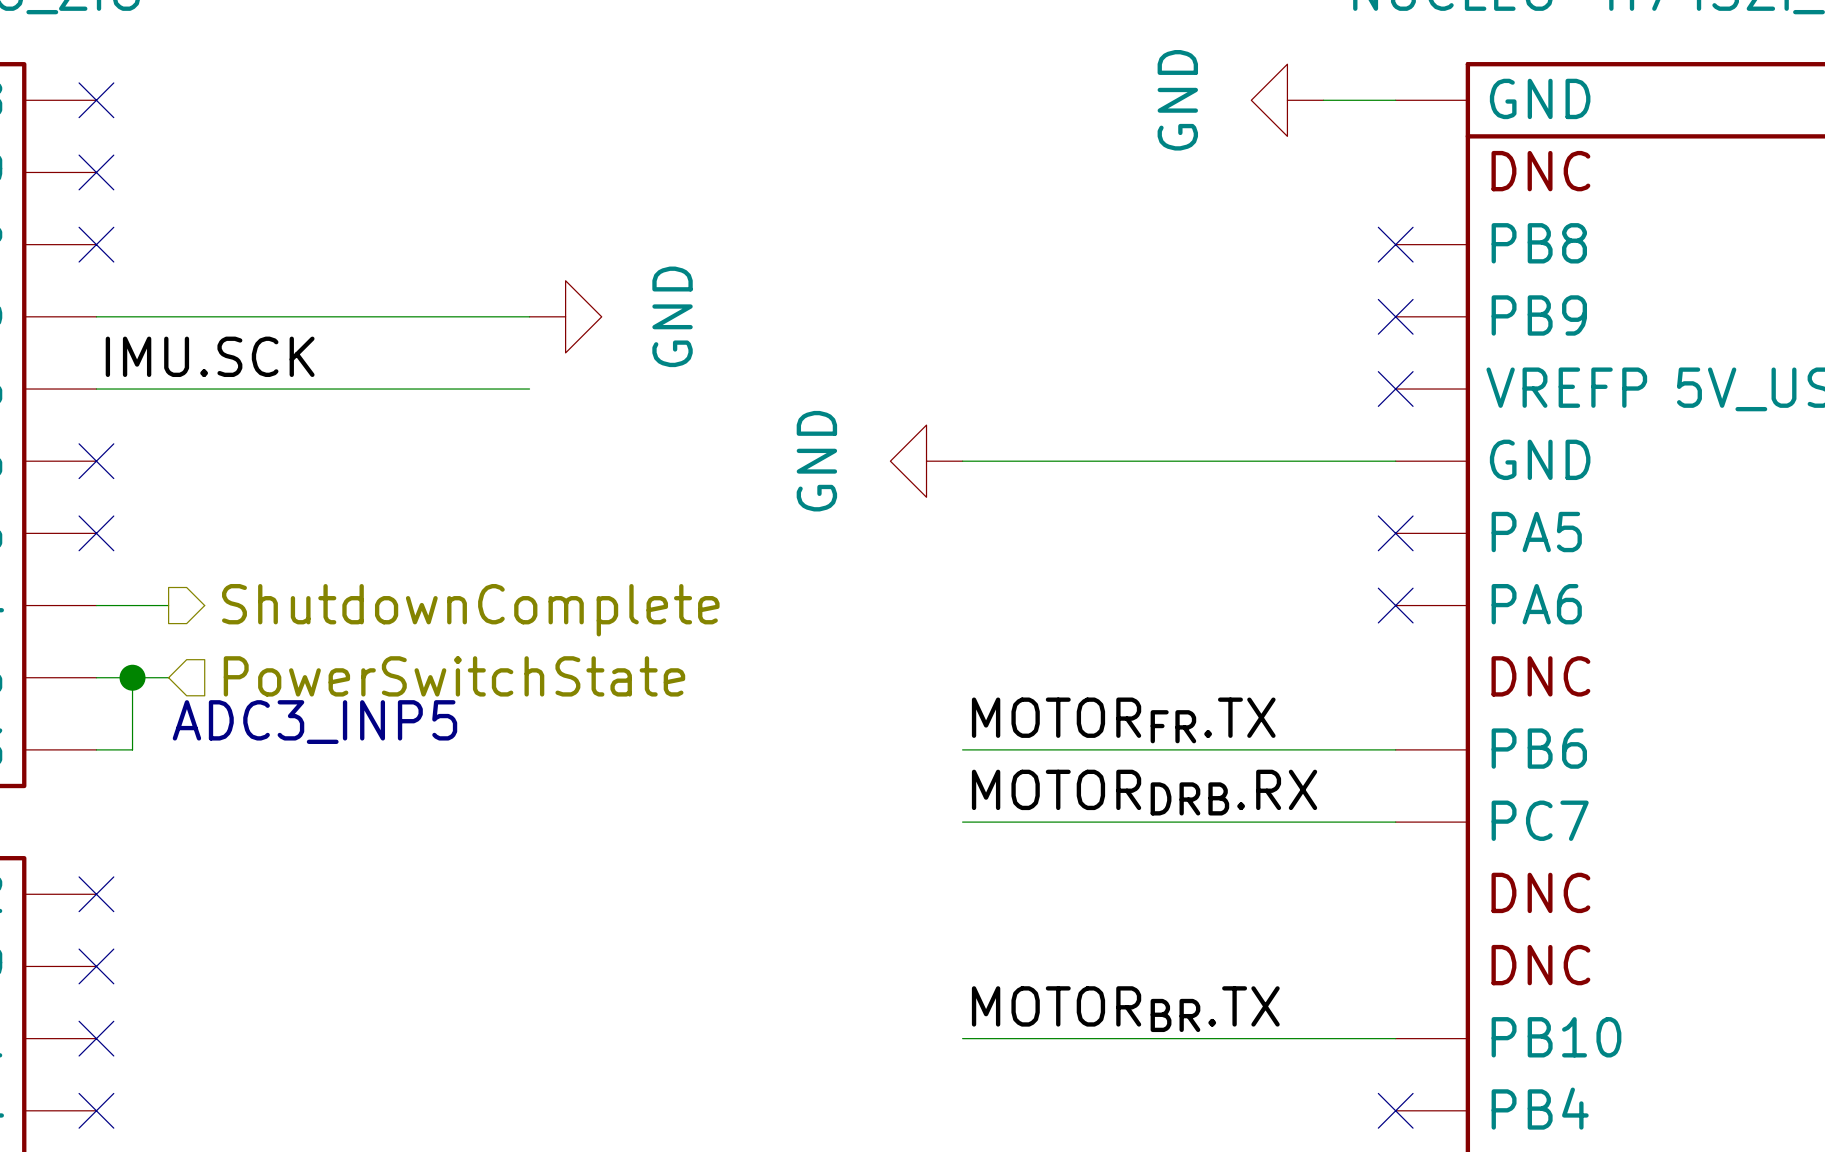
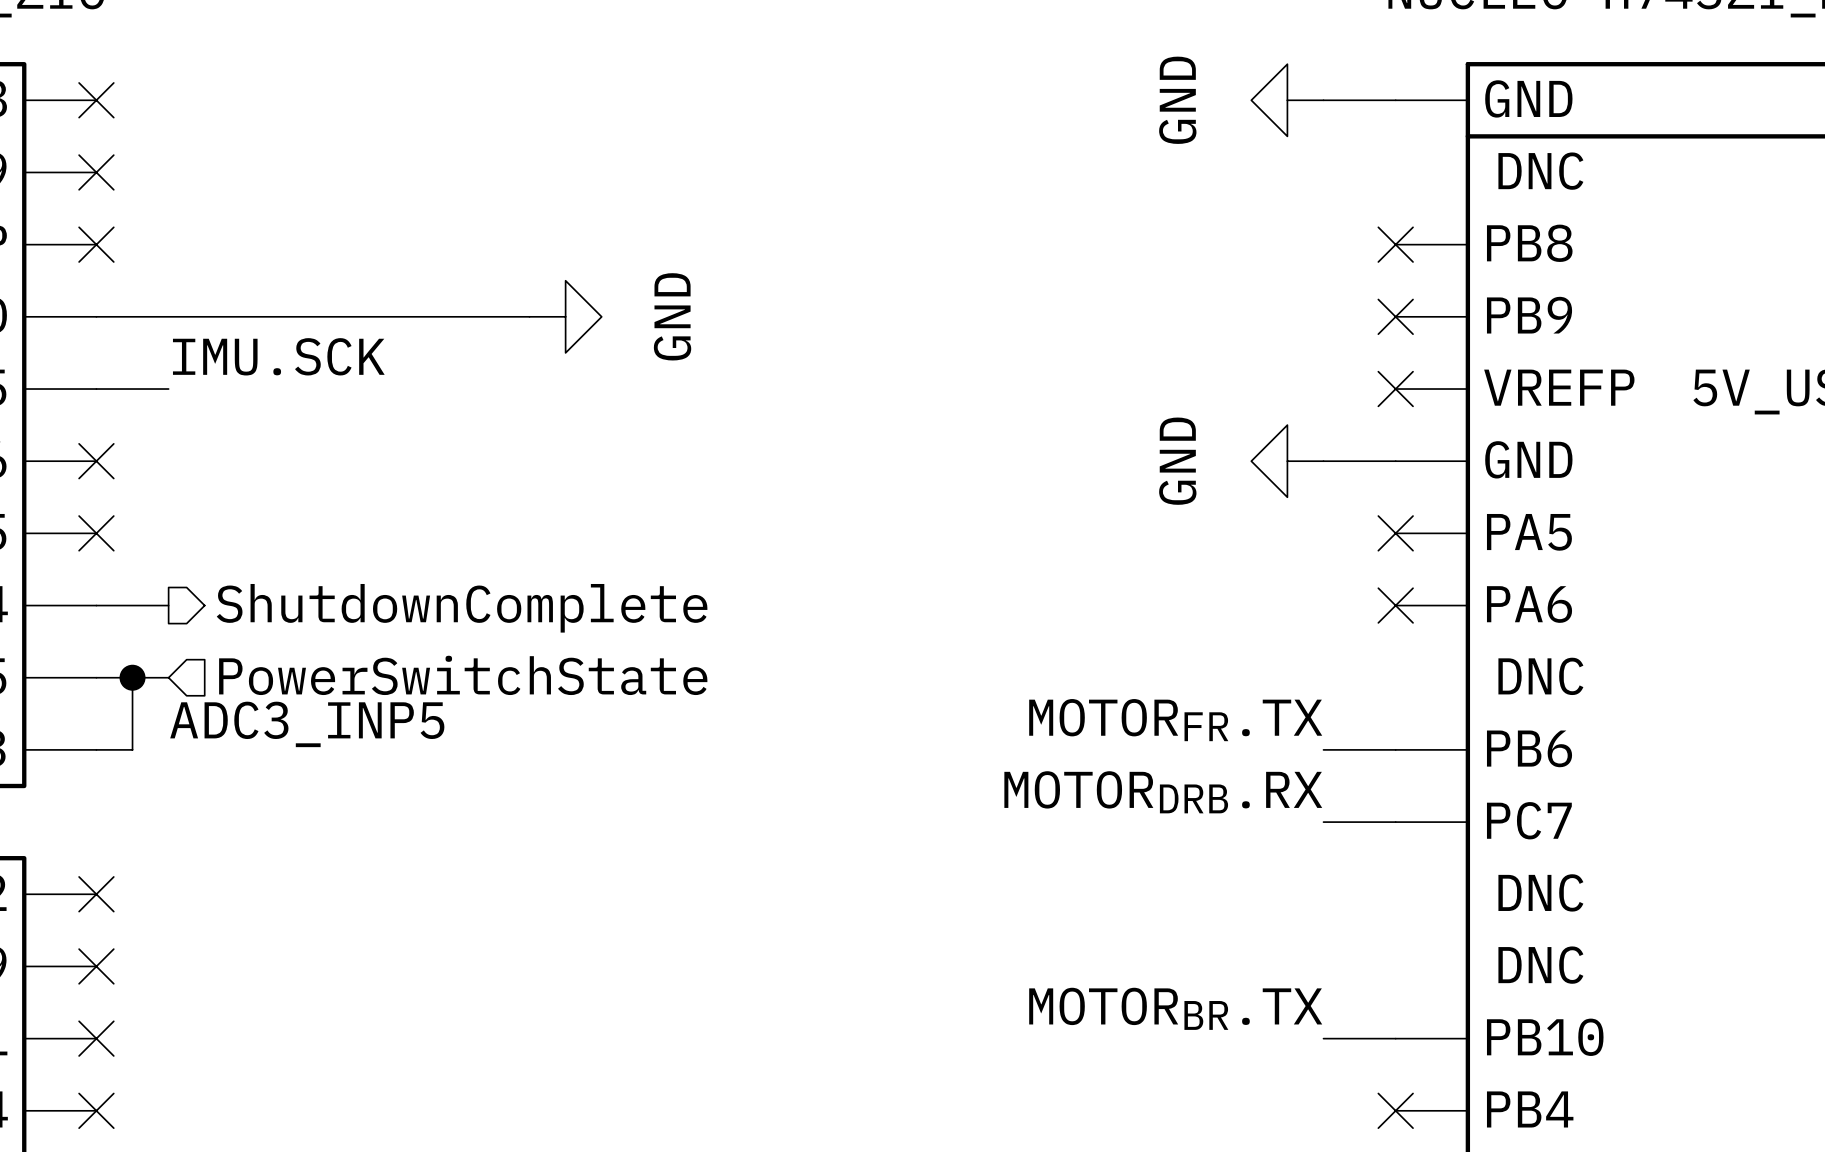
label position: IMU.SCK (210, 356) -> IMU.SCK (278, 356)
wire: (168, 389) (529, 389) -> none
power symbol position: GND (926, 461) -> GND (1287, 461)
wire: (962, 461) (1323, 461) -> none
label position: MOTORFR.TX (1123, 720) -> MOTORFR.TX (1175, 720)
wire: (962, 749) (1323, 749) -> none
label position: MOTORDRB.RX (1144, 792) -> MOTORDRB.RX (1163, 792)
wire: (962, 822) (1323, 822) -> none
label position: MOTORBR.TX (1125, 1009) -> MOTORBR.TX (1175, 1008)
wire: (962, 1038) (1323, 1038) -> none

